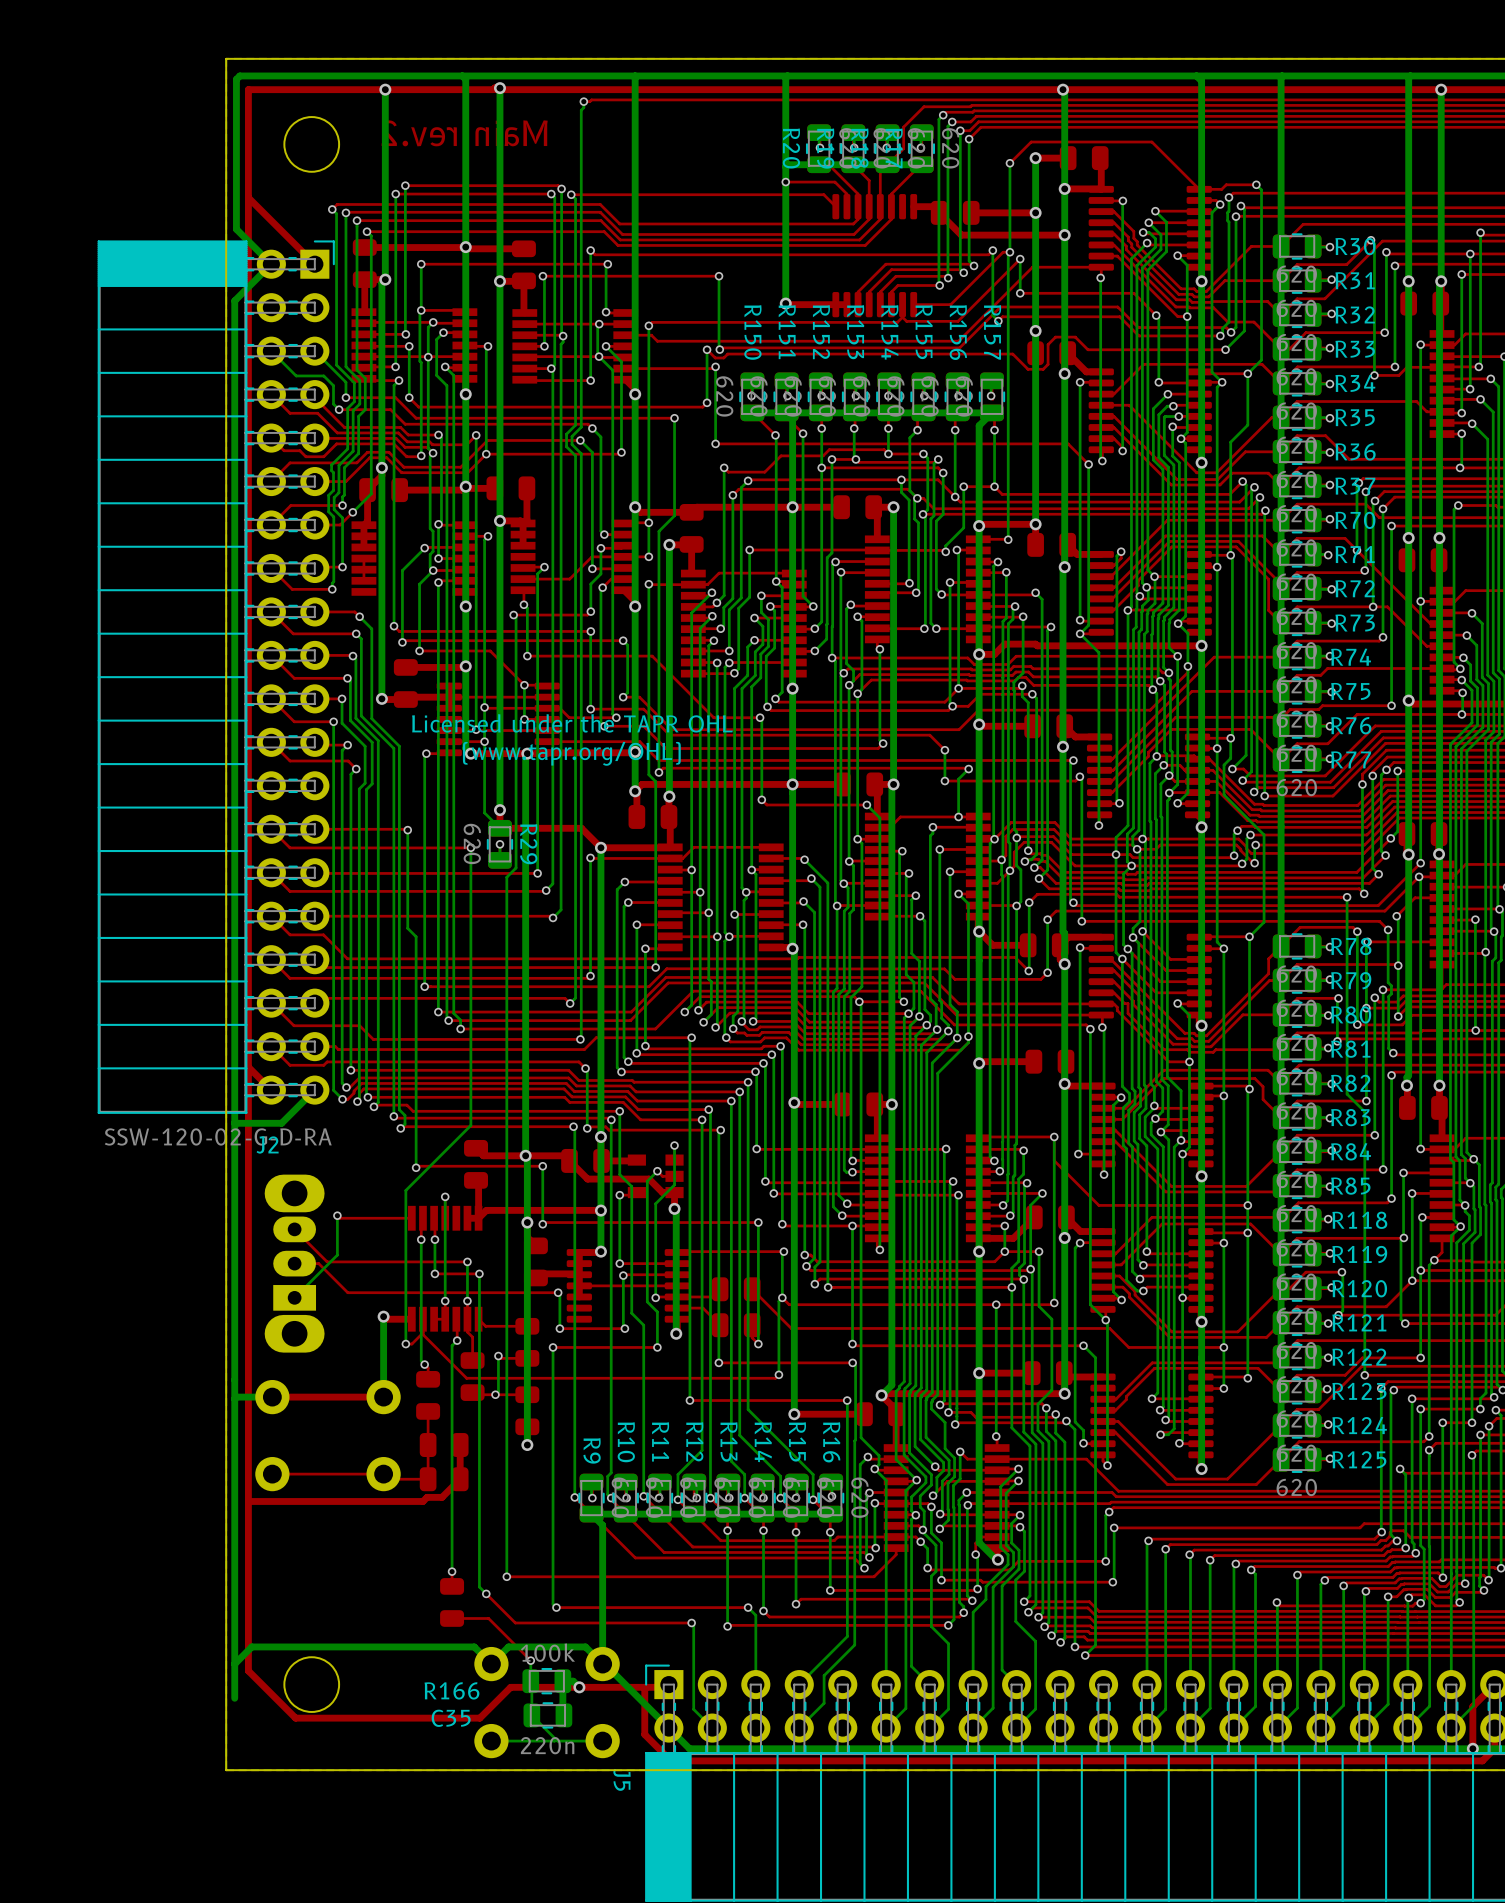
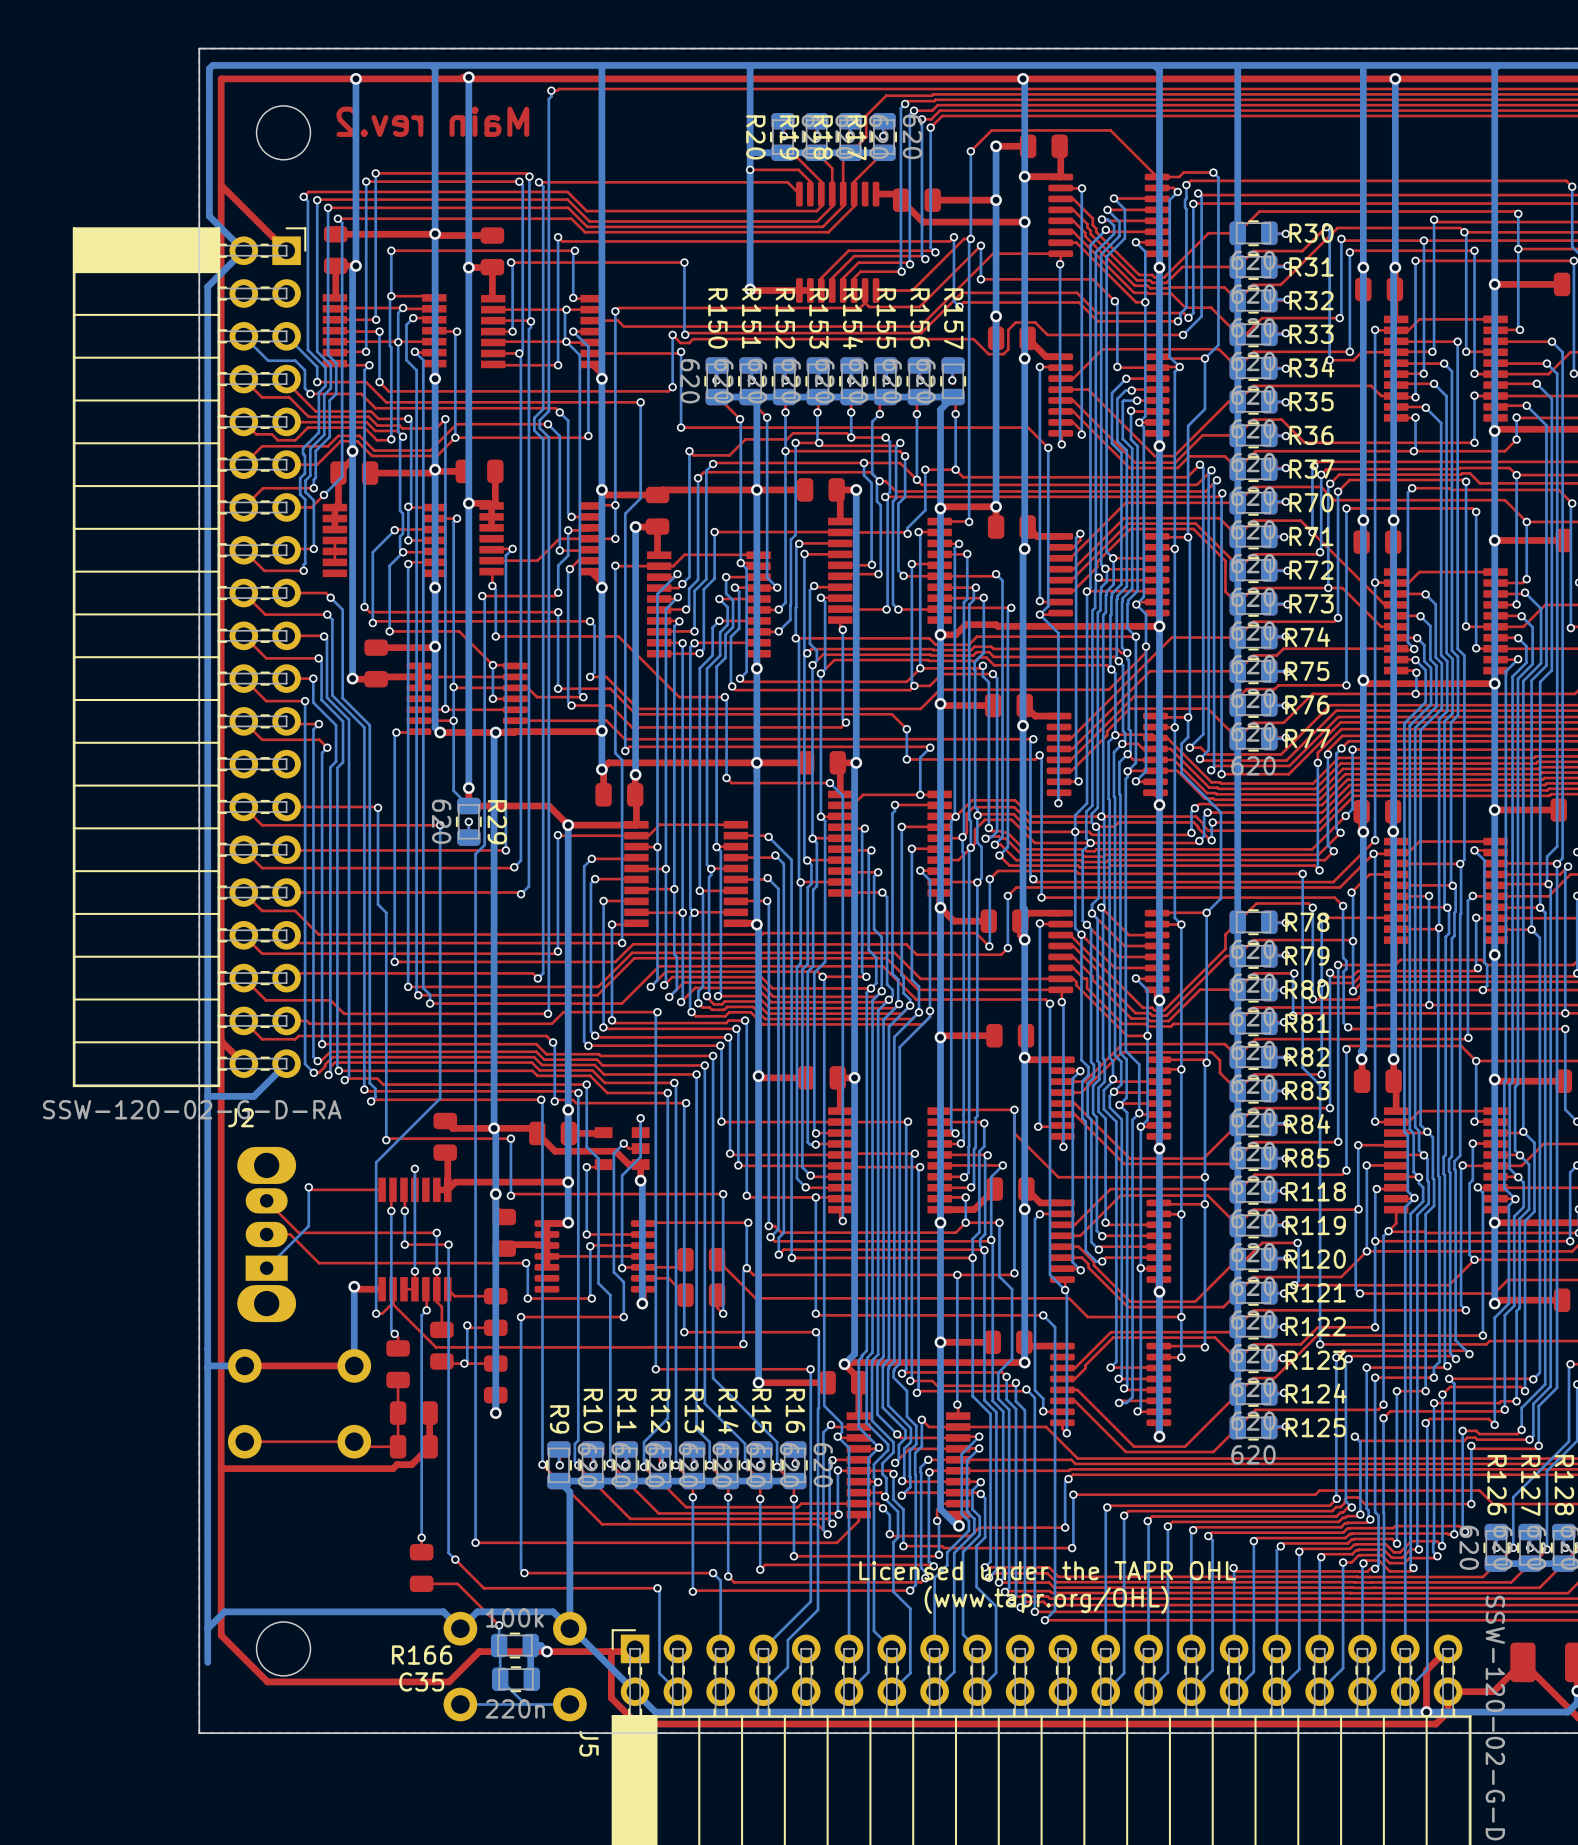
text: Licensed under the TAPR OHL (572, 723) -> none
text: (www.tapr.org/OHL) (571, 753) -> none
text: none -> Licensed under the TAPR OHL (1047, 1570)
text: none -> (www.tapr.org/OHL) (1046, 1599)

